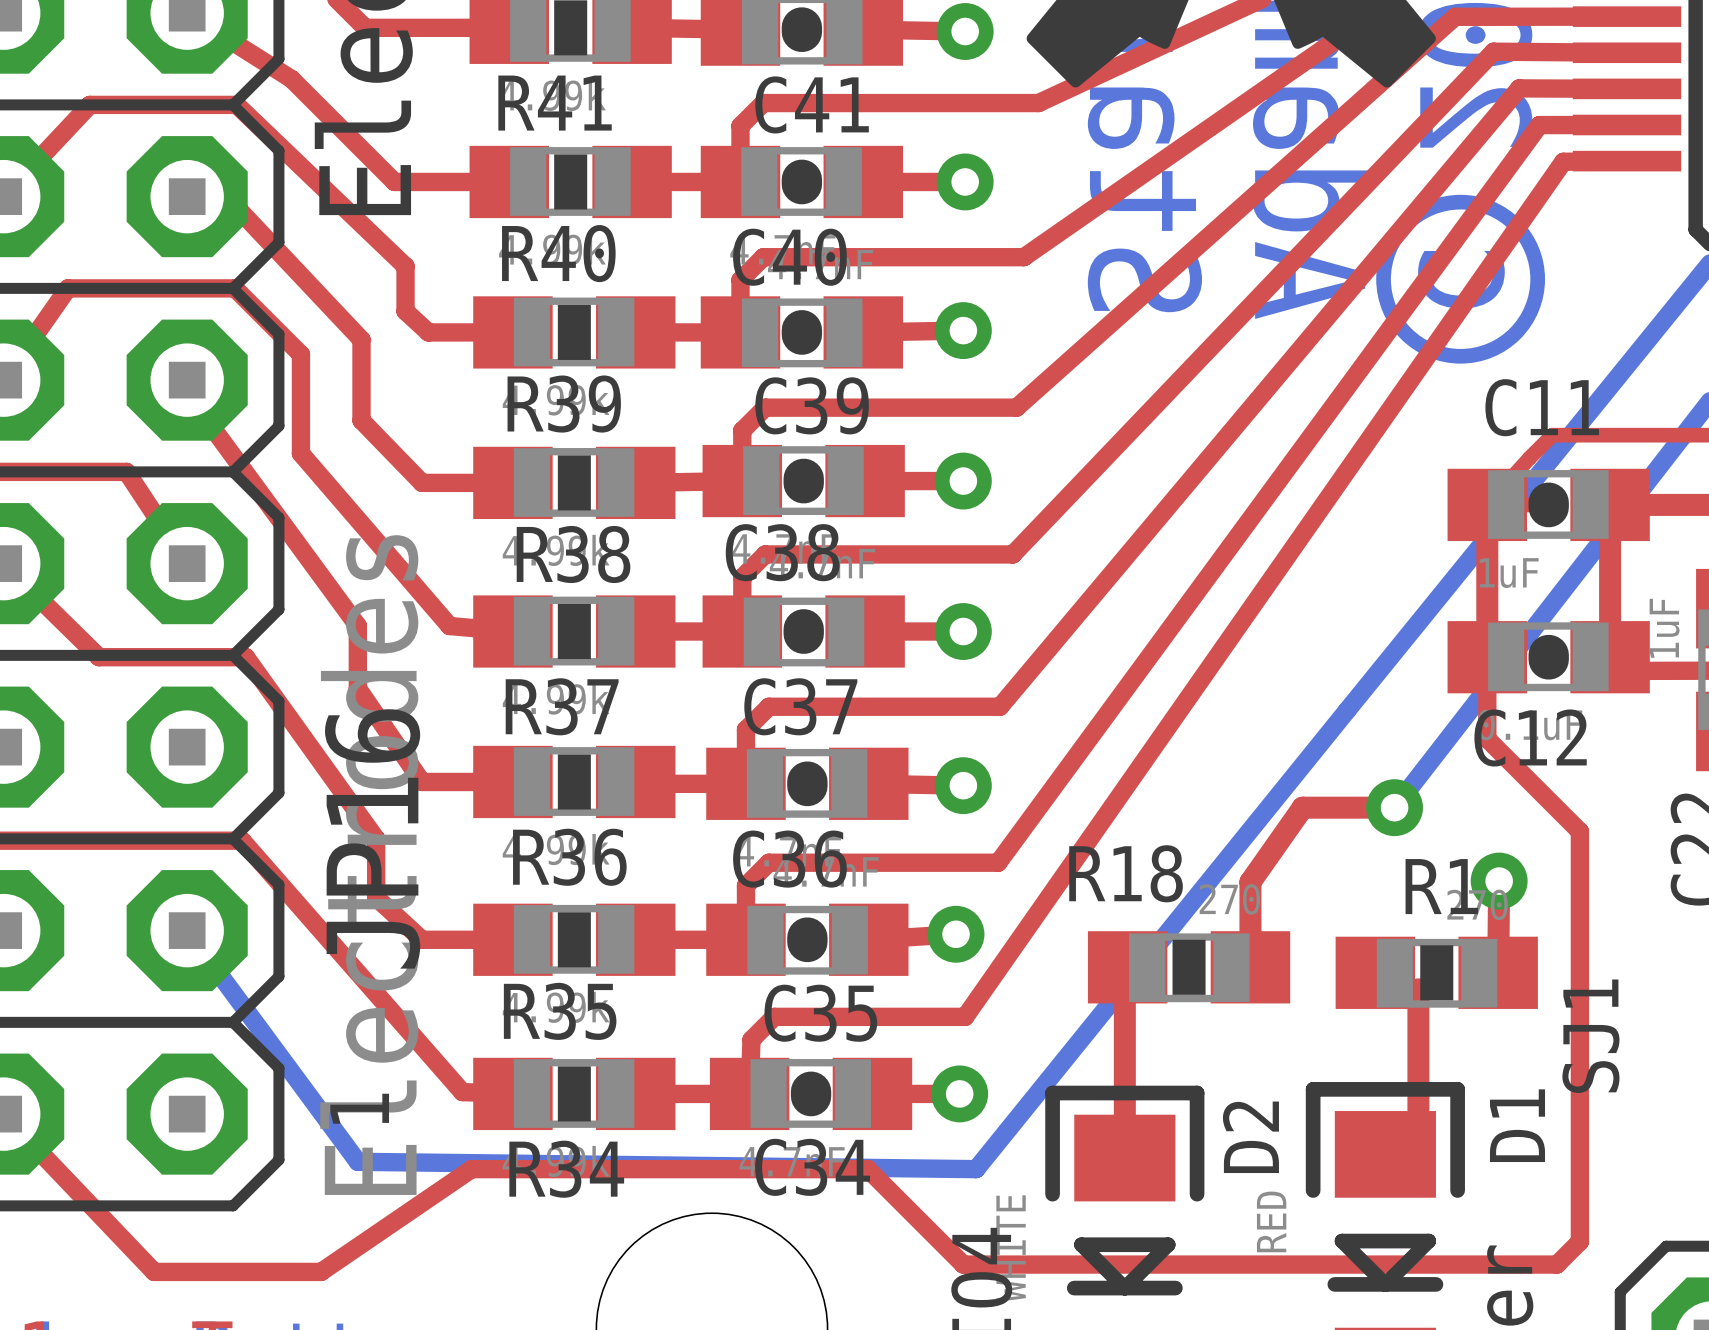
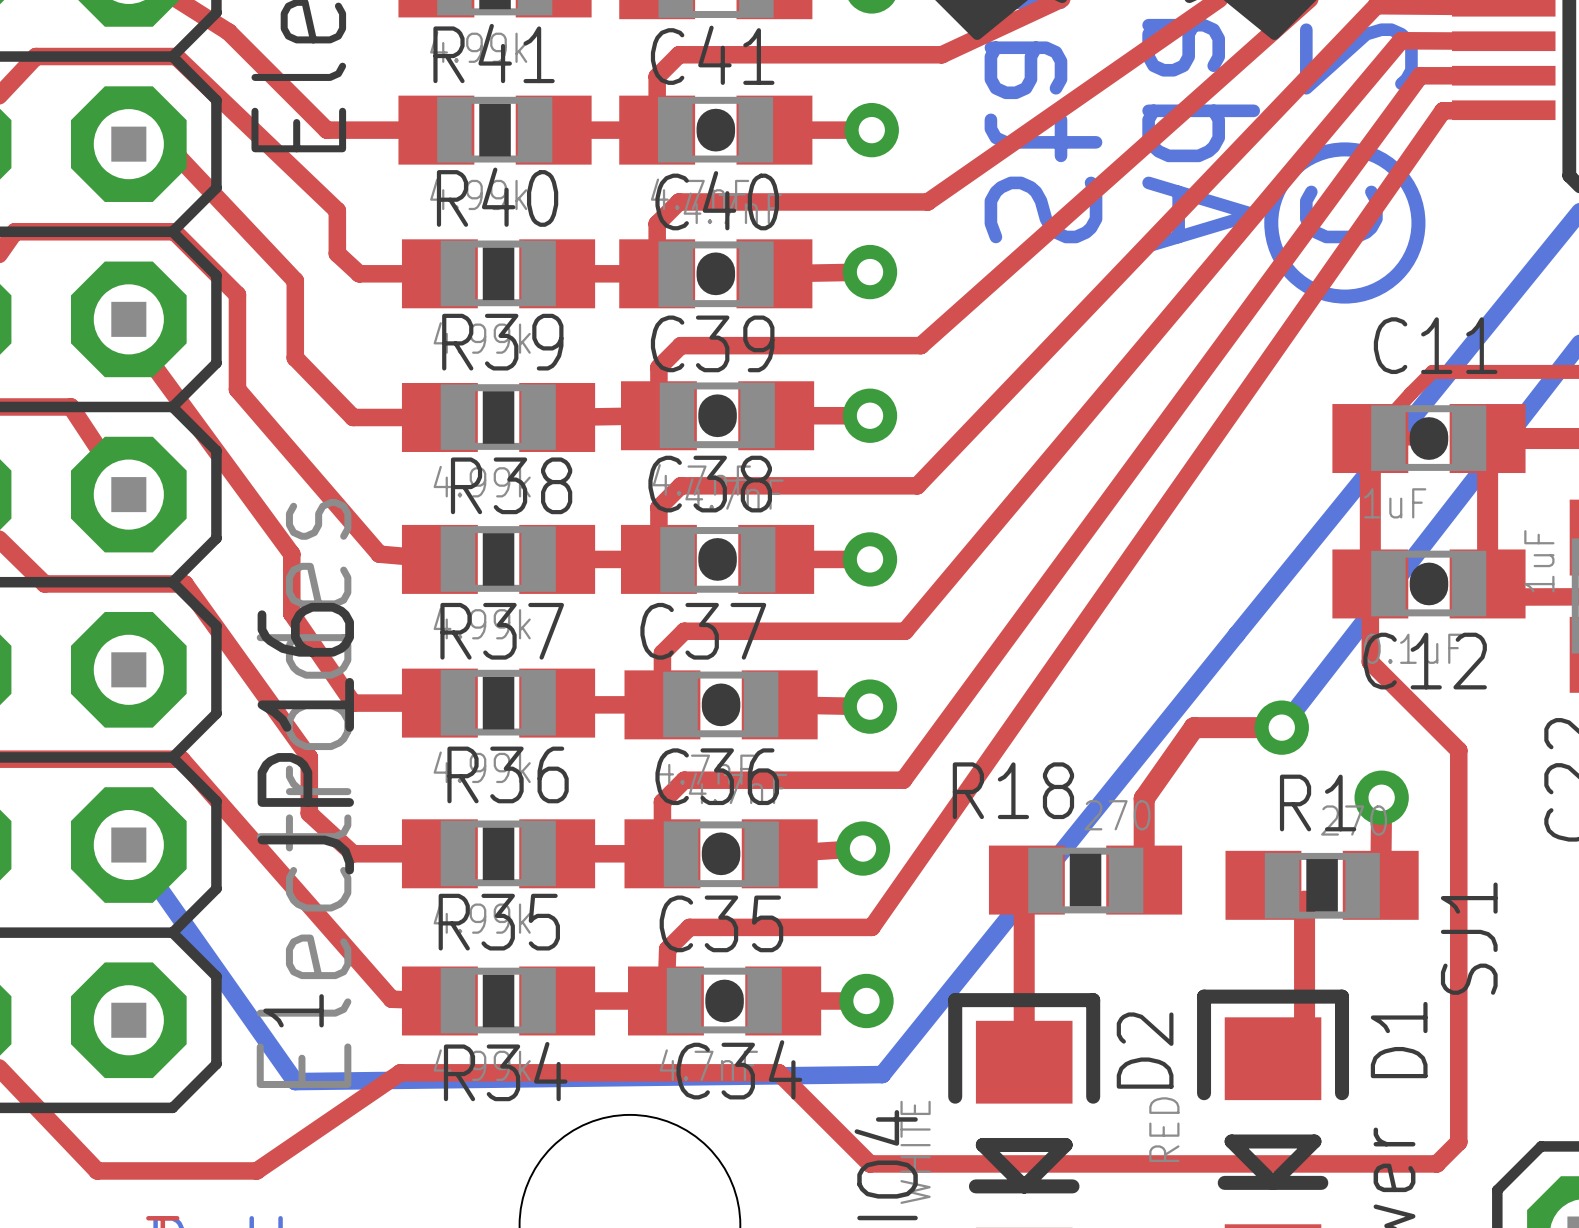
bottom track: (1347, 710) (976, 1169) (357, 1161) (187, 930) -> (1236, 634) (882, 1074) (295, 1081) (128, 845)

